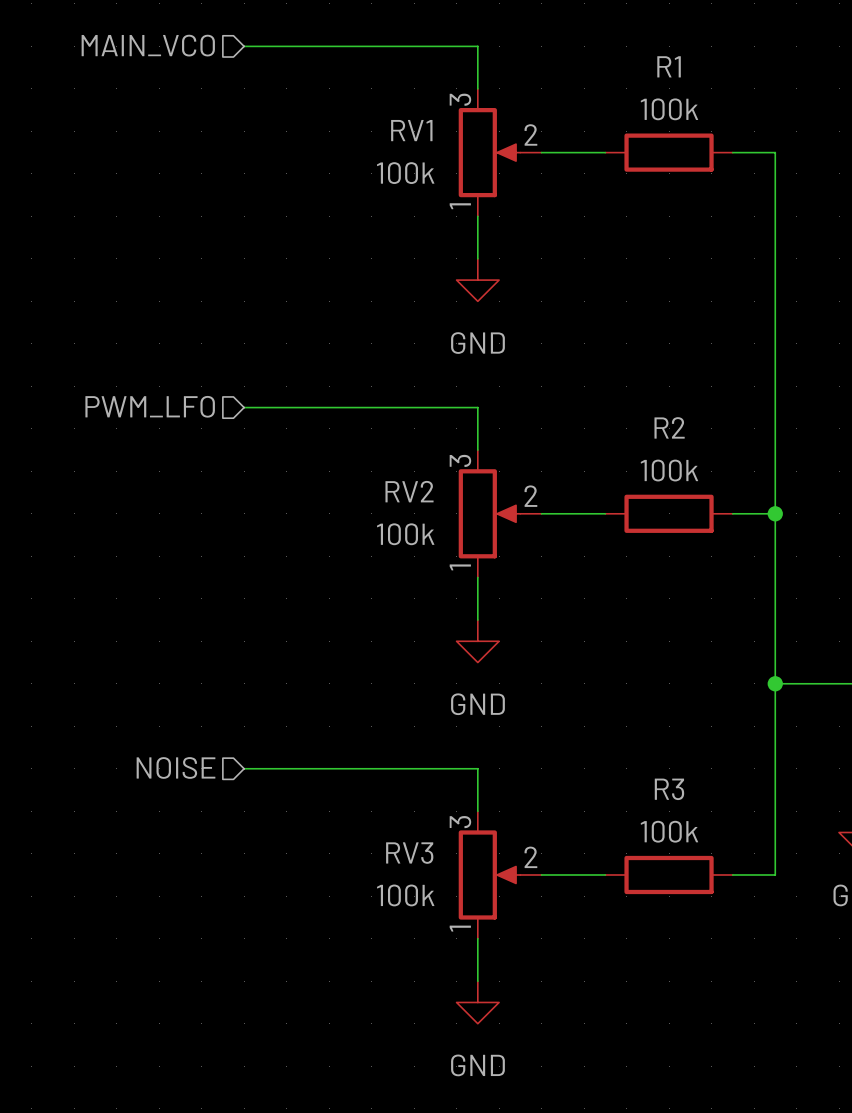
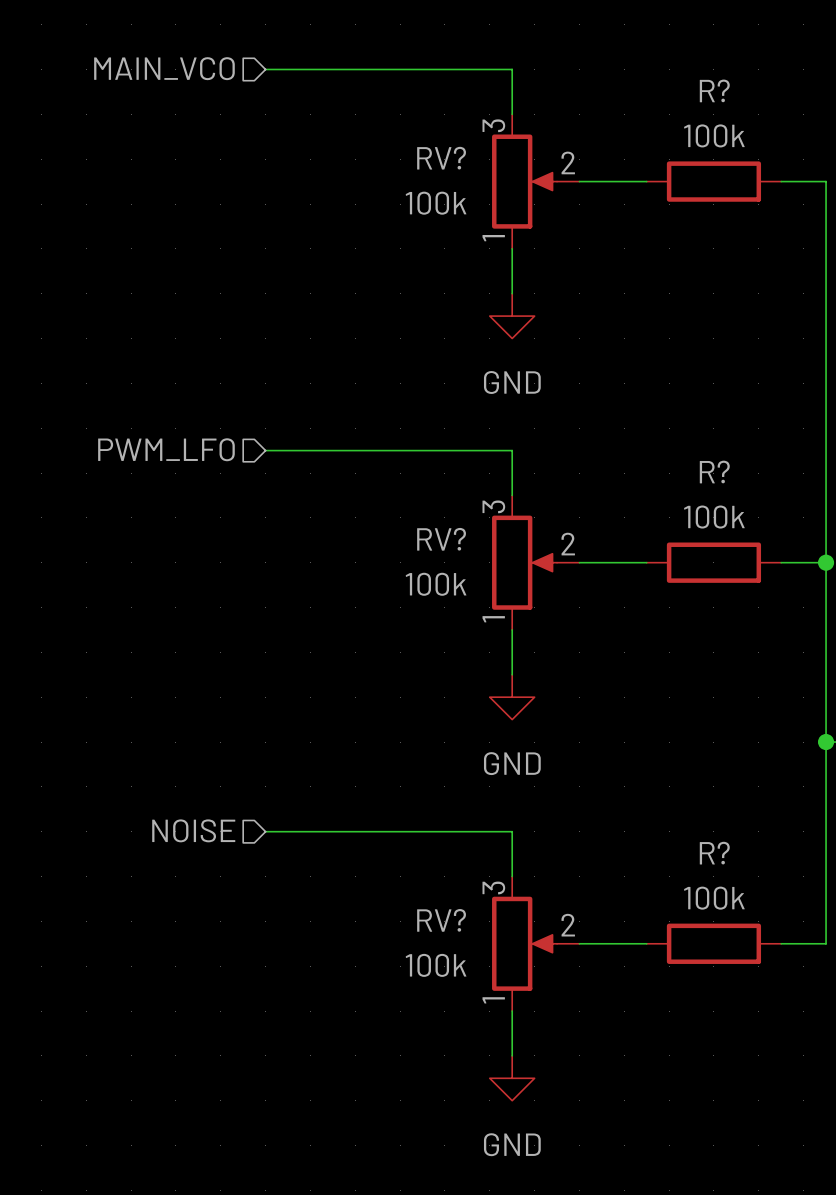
R1 name: R1 (669, 66) -> R? (714, 90)
RV1 name: RV1 (411, 130) -> RV? (441, 158)
R2 name: R2 (669, 427) -> R? (714, 472)
RV2 name: RV2 (409, 491) -> RV? (441, 539)
R3 name: R3 (669, 789) -> R? (714, 853)
RV3 name: RV3 (409, 853) -> RV? (441, 920)

